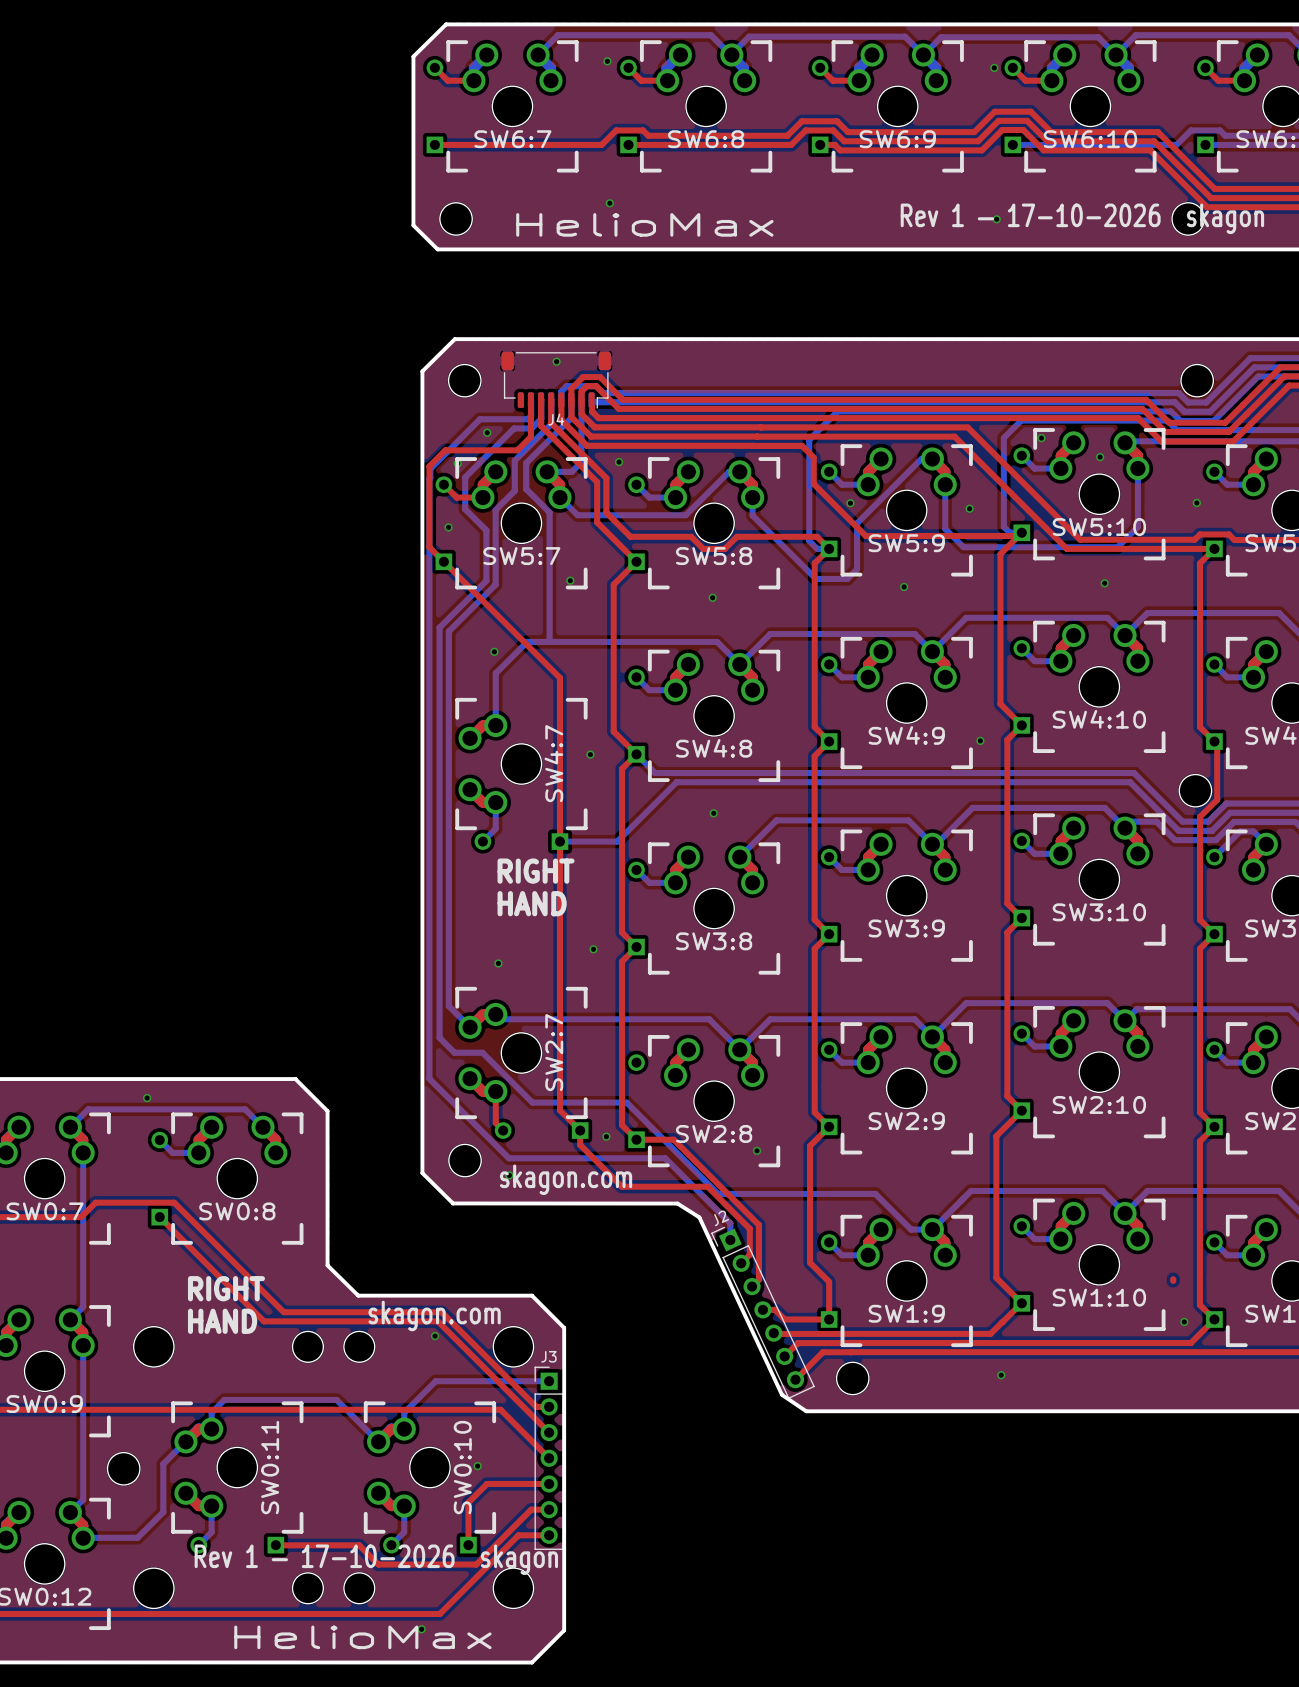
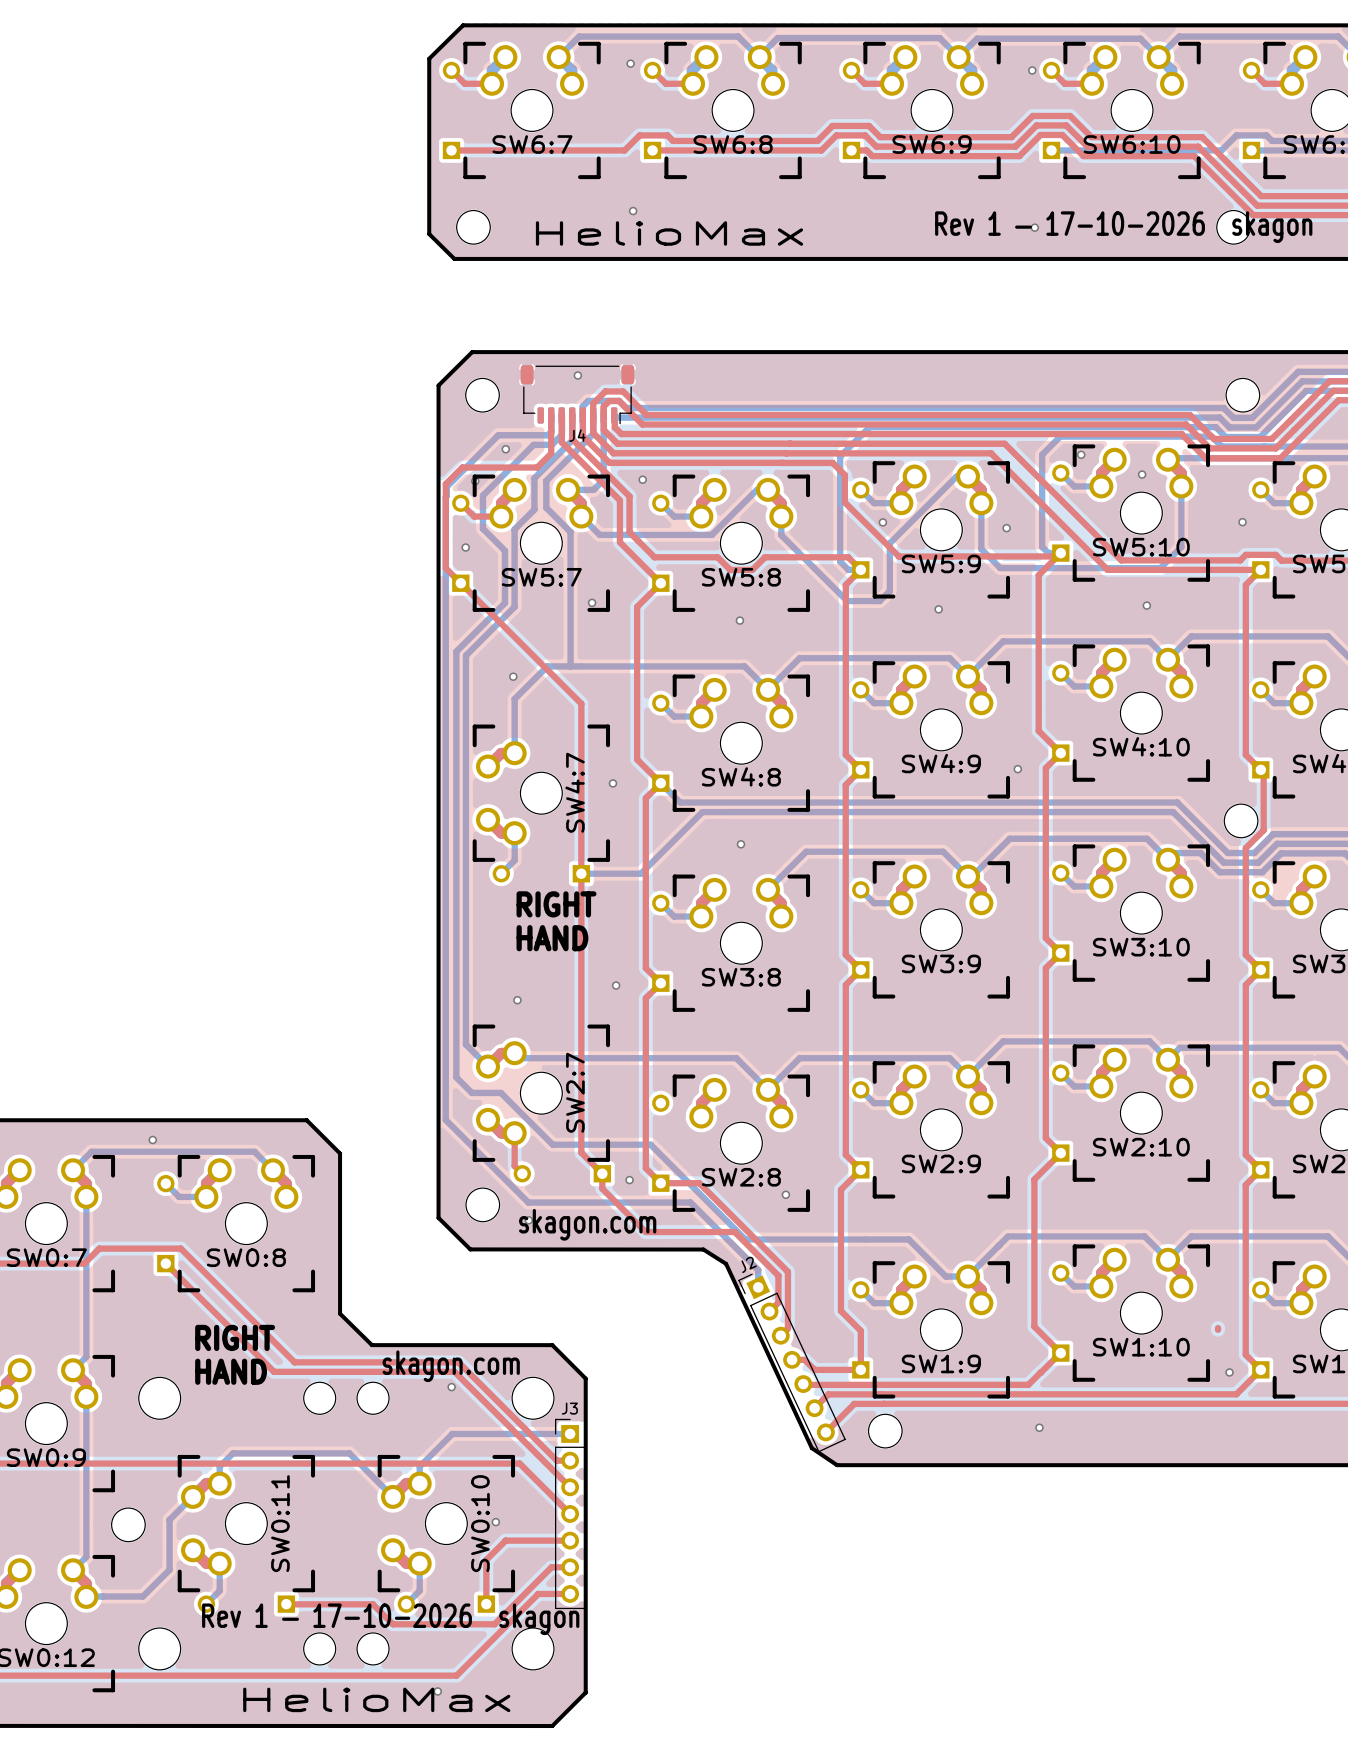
bottom track: (1266, 844) (1253, 831) (1240, 831) (1214, 857) -> (1301, 903) (1274, 903) (1260, 889)

